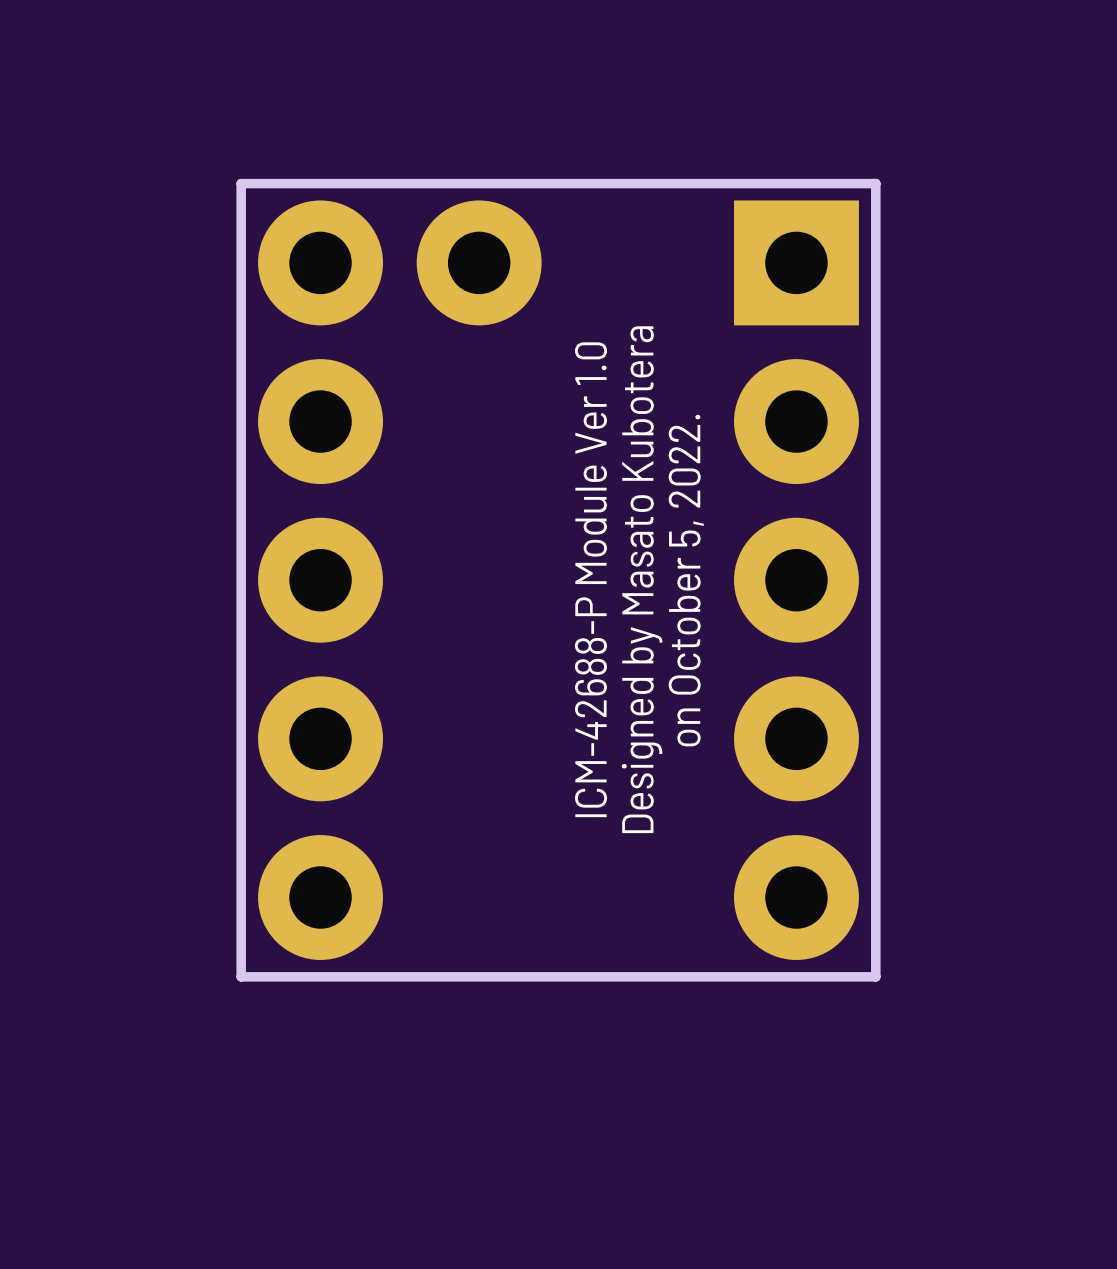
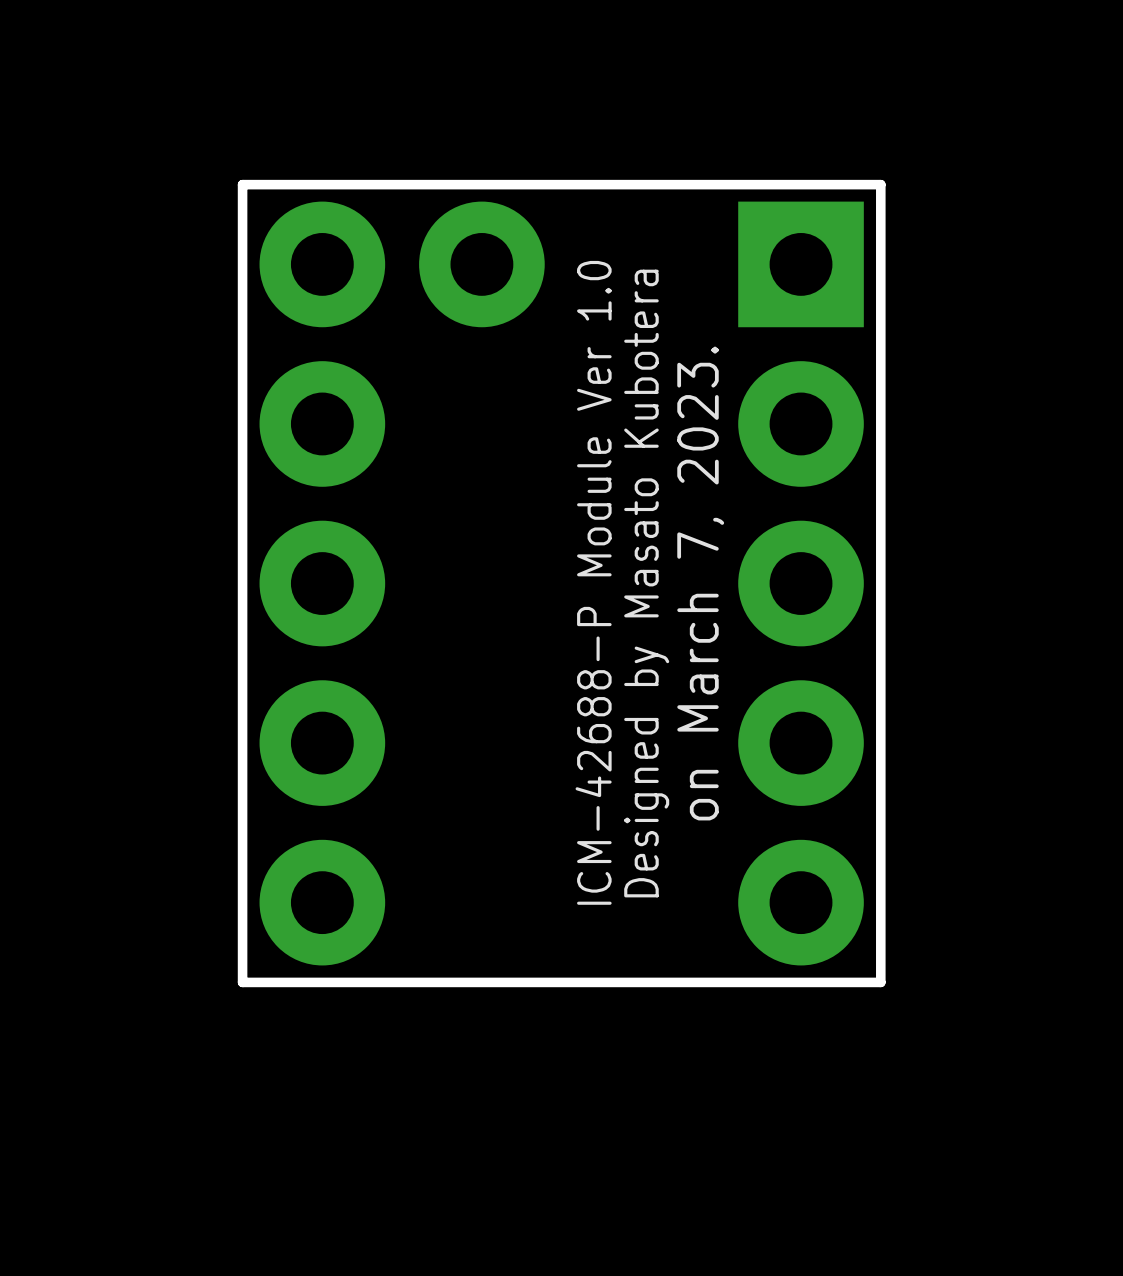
text: on October 5, 2022. (686, 580) -> on March 7, 2023. (700, 583)

